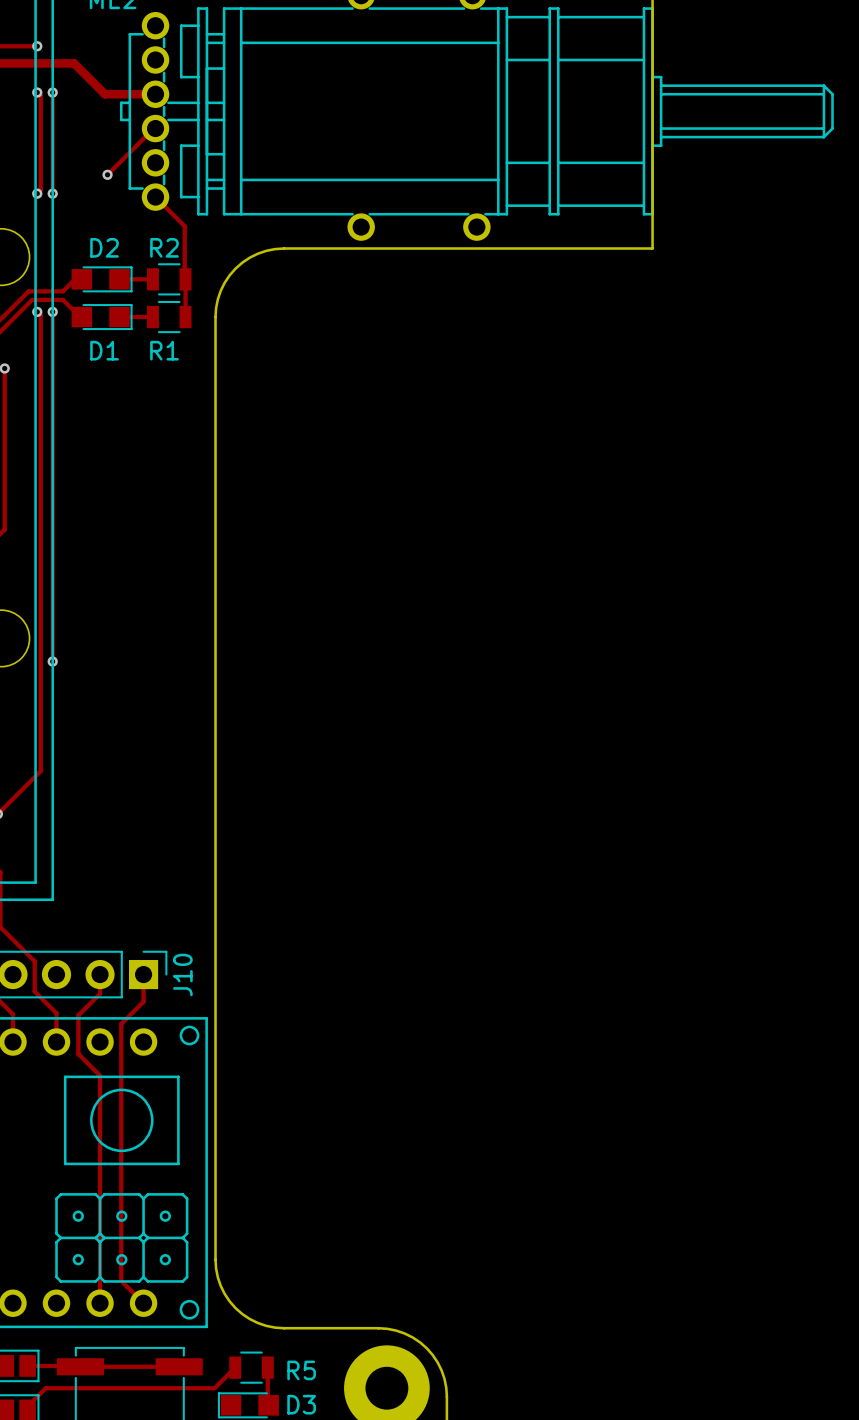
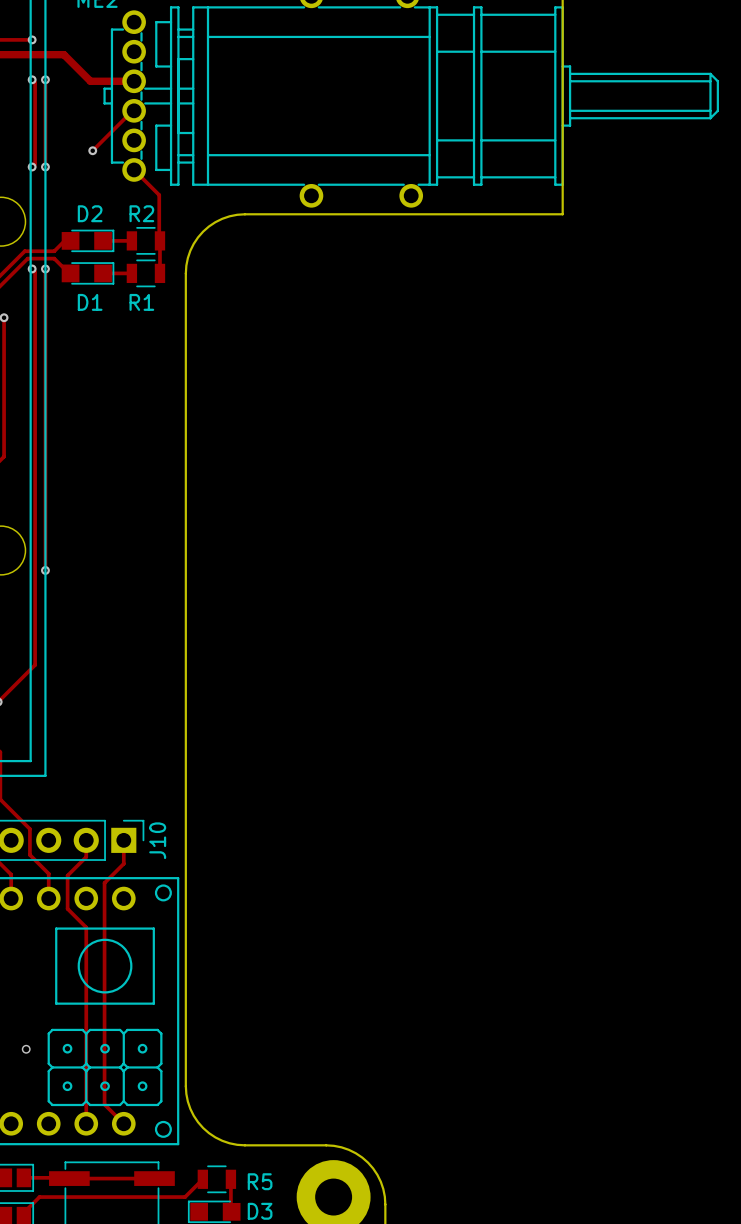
via: none -> (26, 1049)

